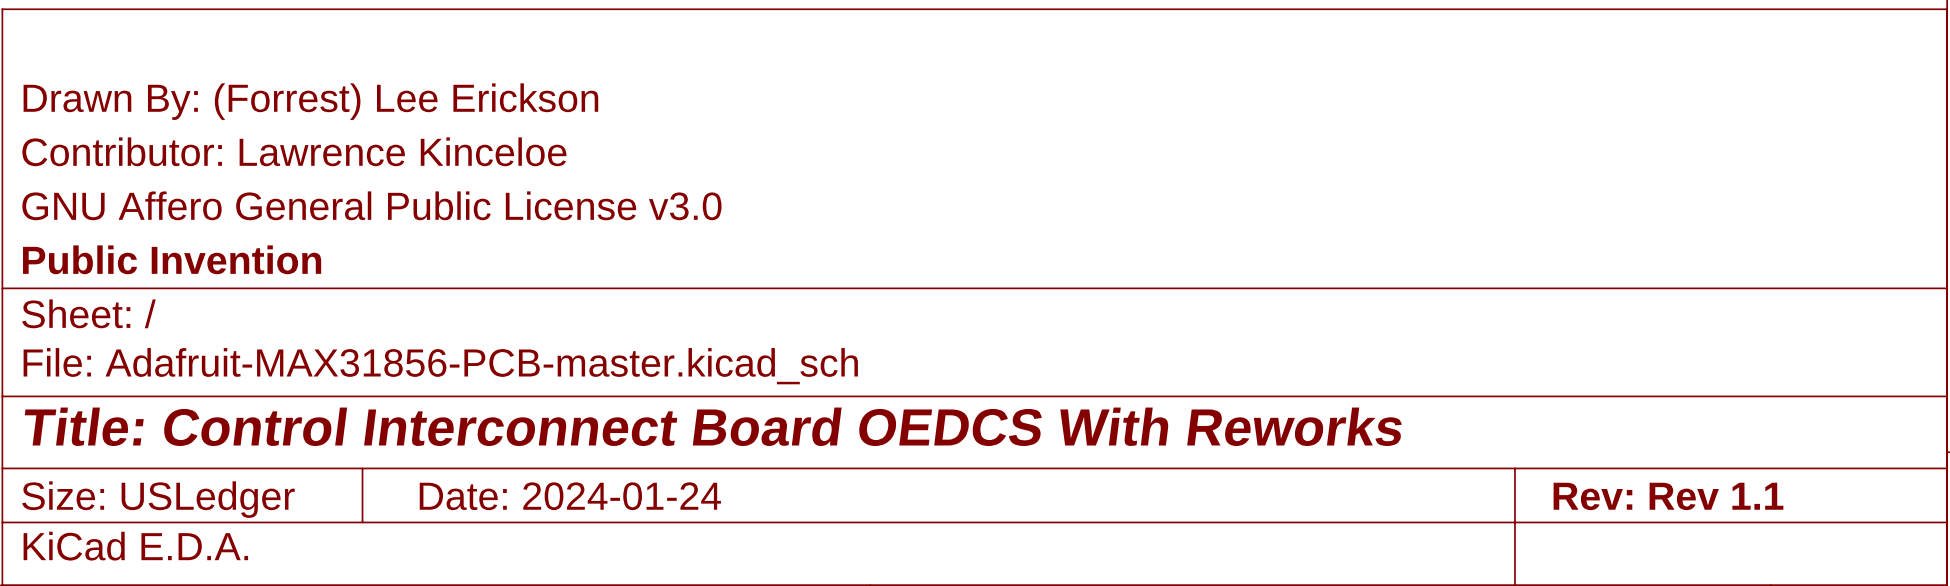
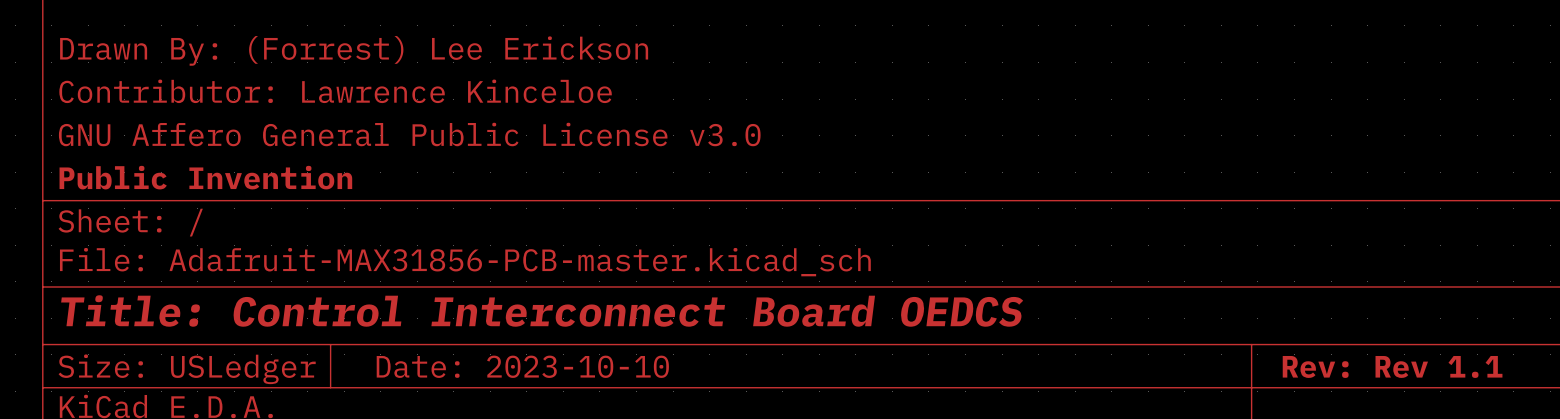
title block: Title: Control Interconnect Board OEDCS With Reworks (713, 426) -> Title: Control Interconnect Board OEDCS (542, 310)
title block: Date: 2024-01-24 (570, 496) -> Date: 2023-10-10 (522, 366)

